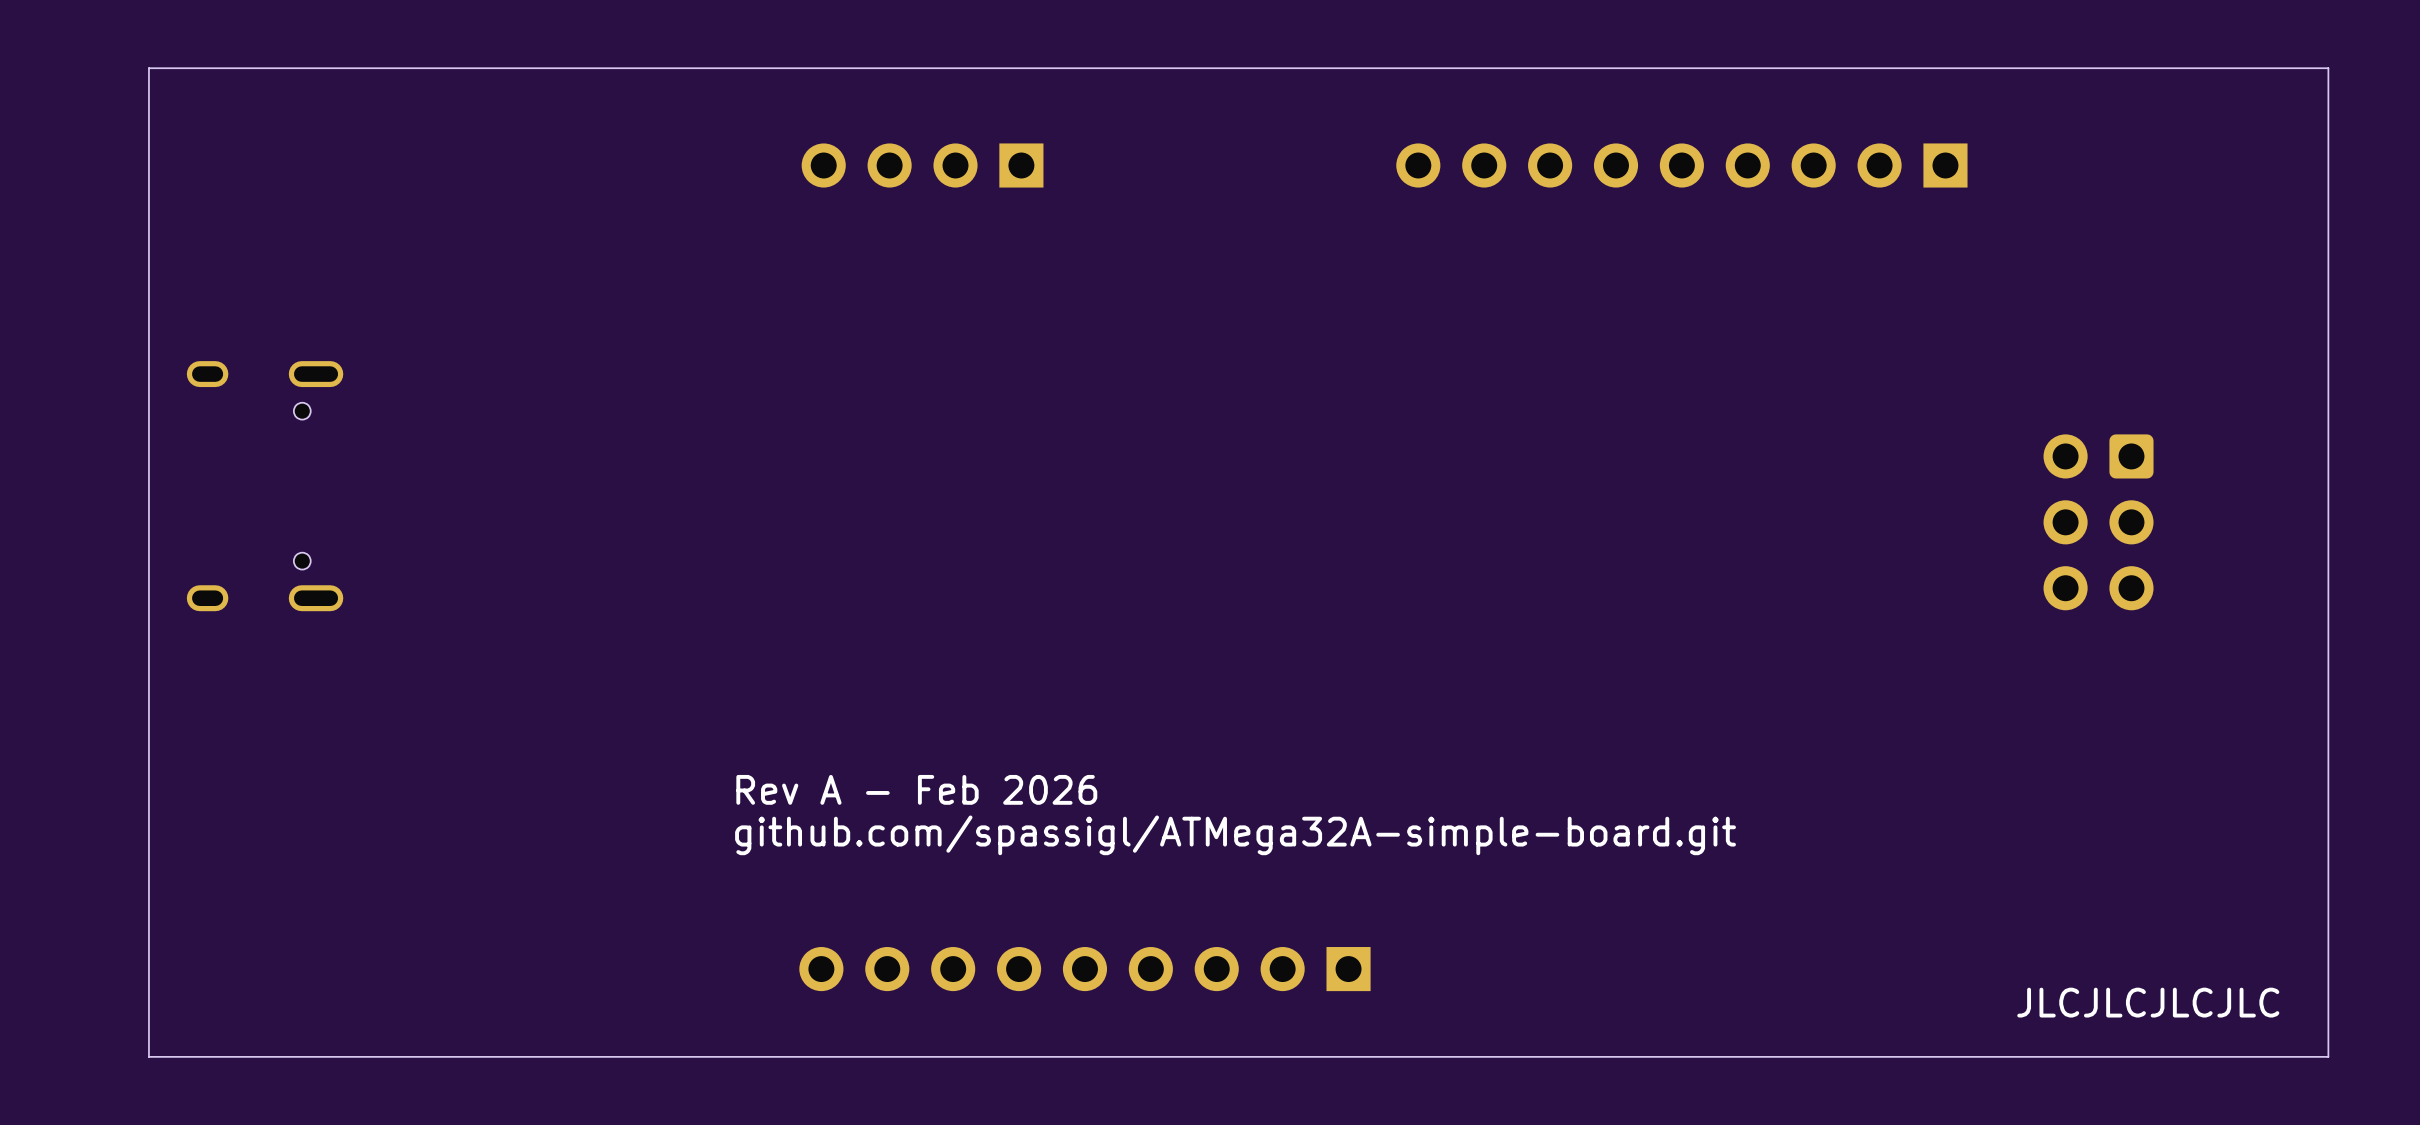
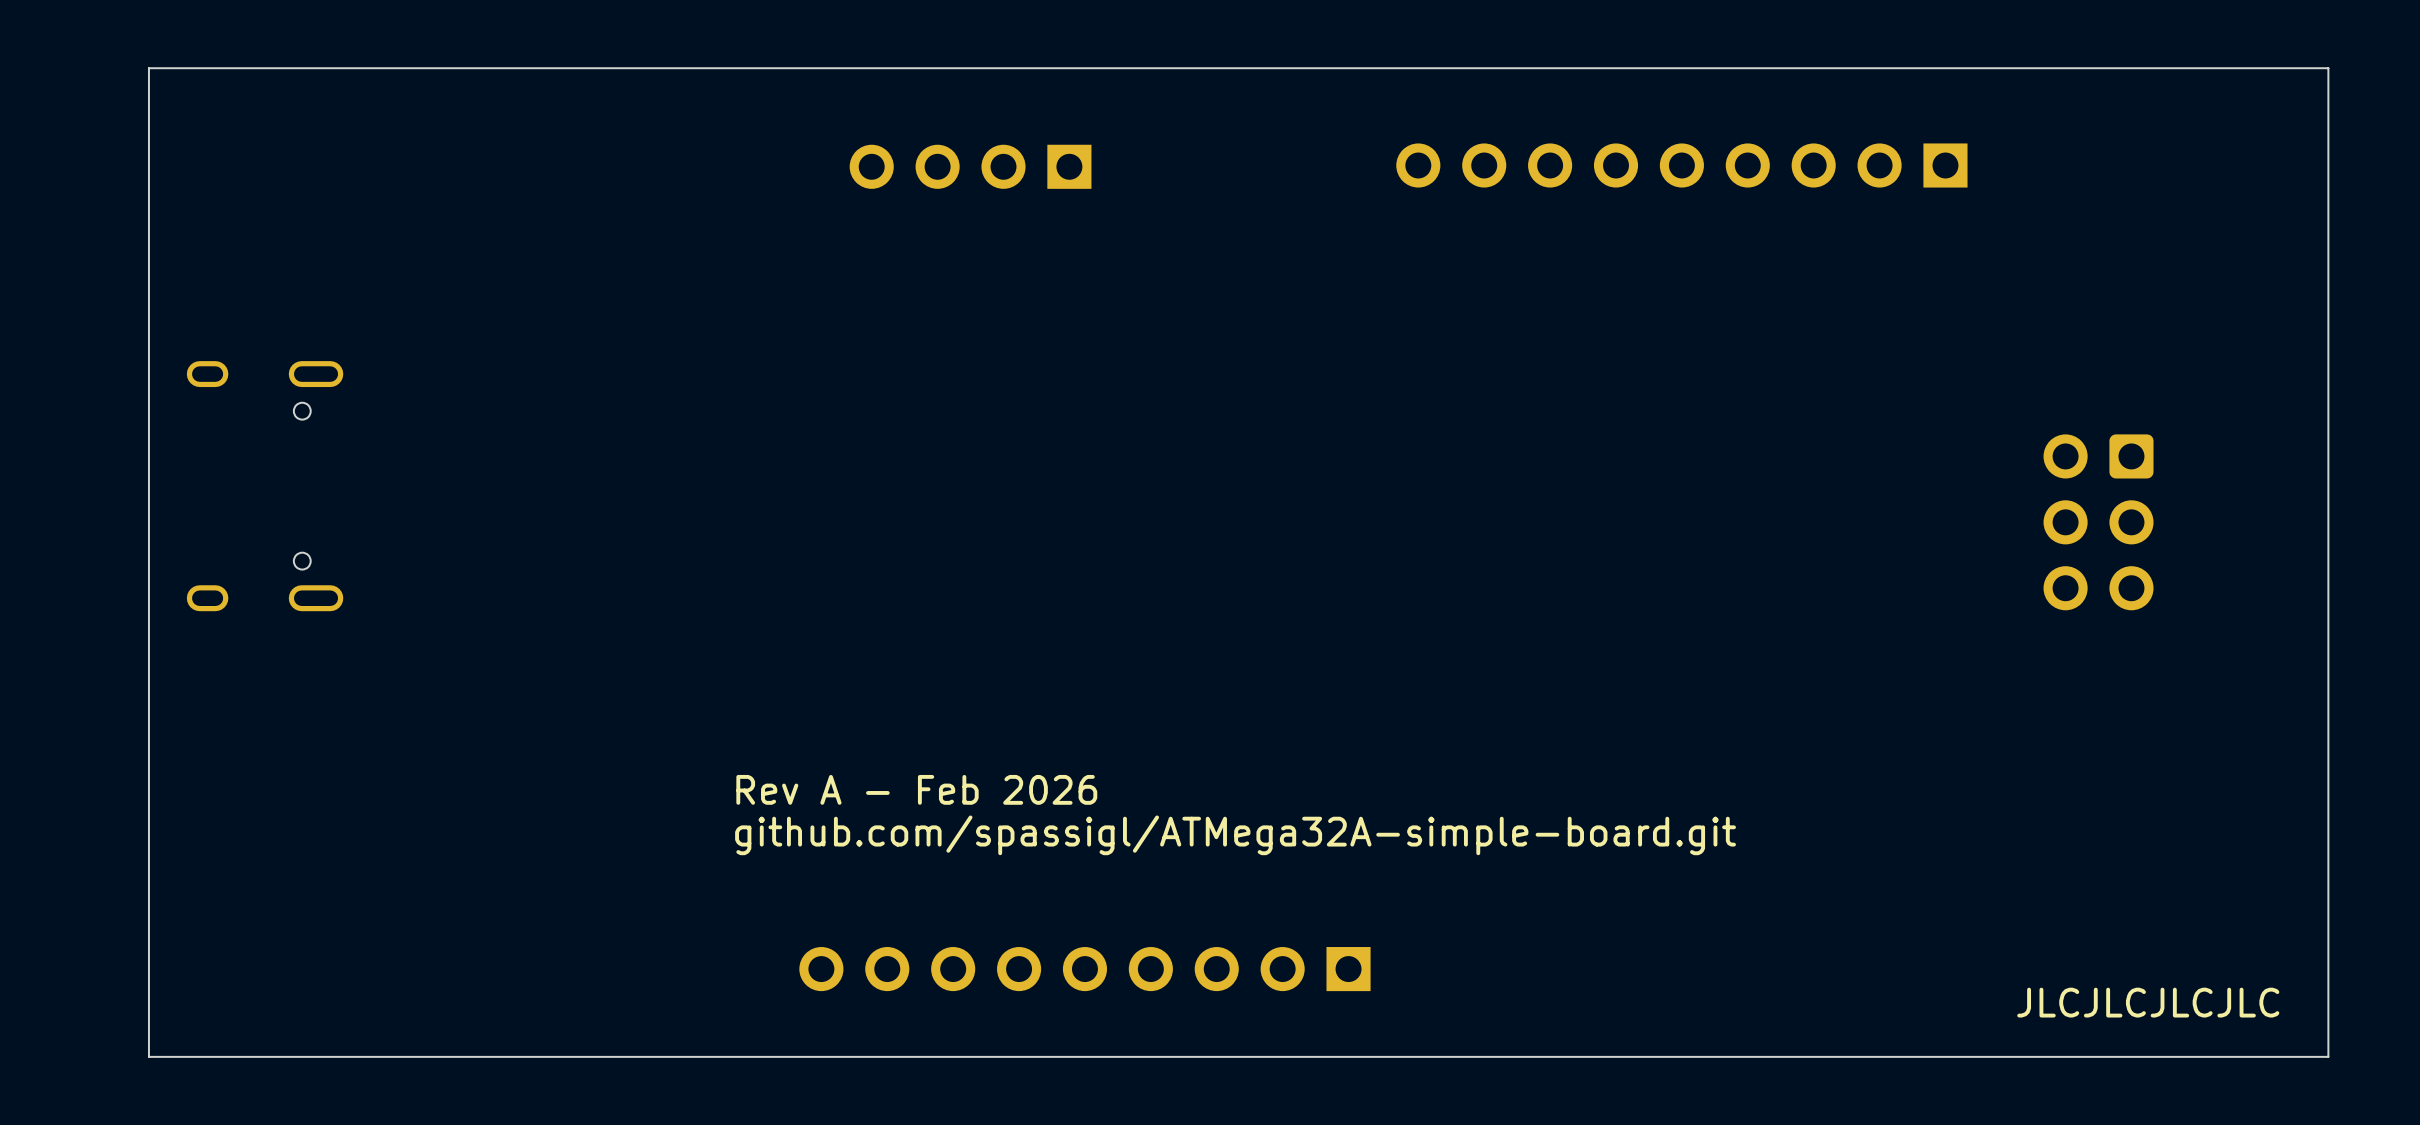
part position: (922, 165) -> (970, 166)

